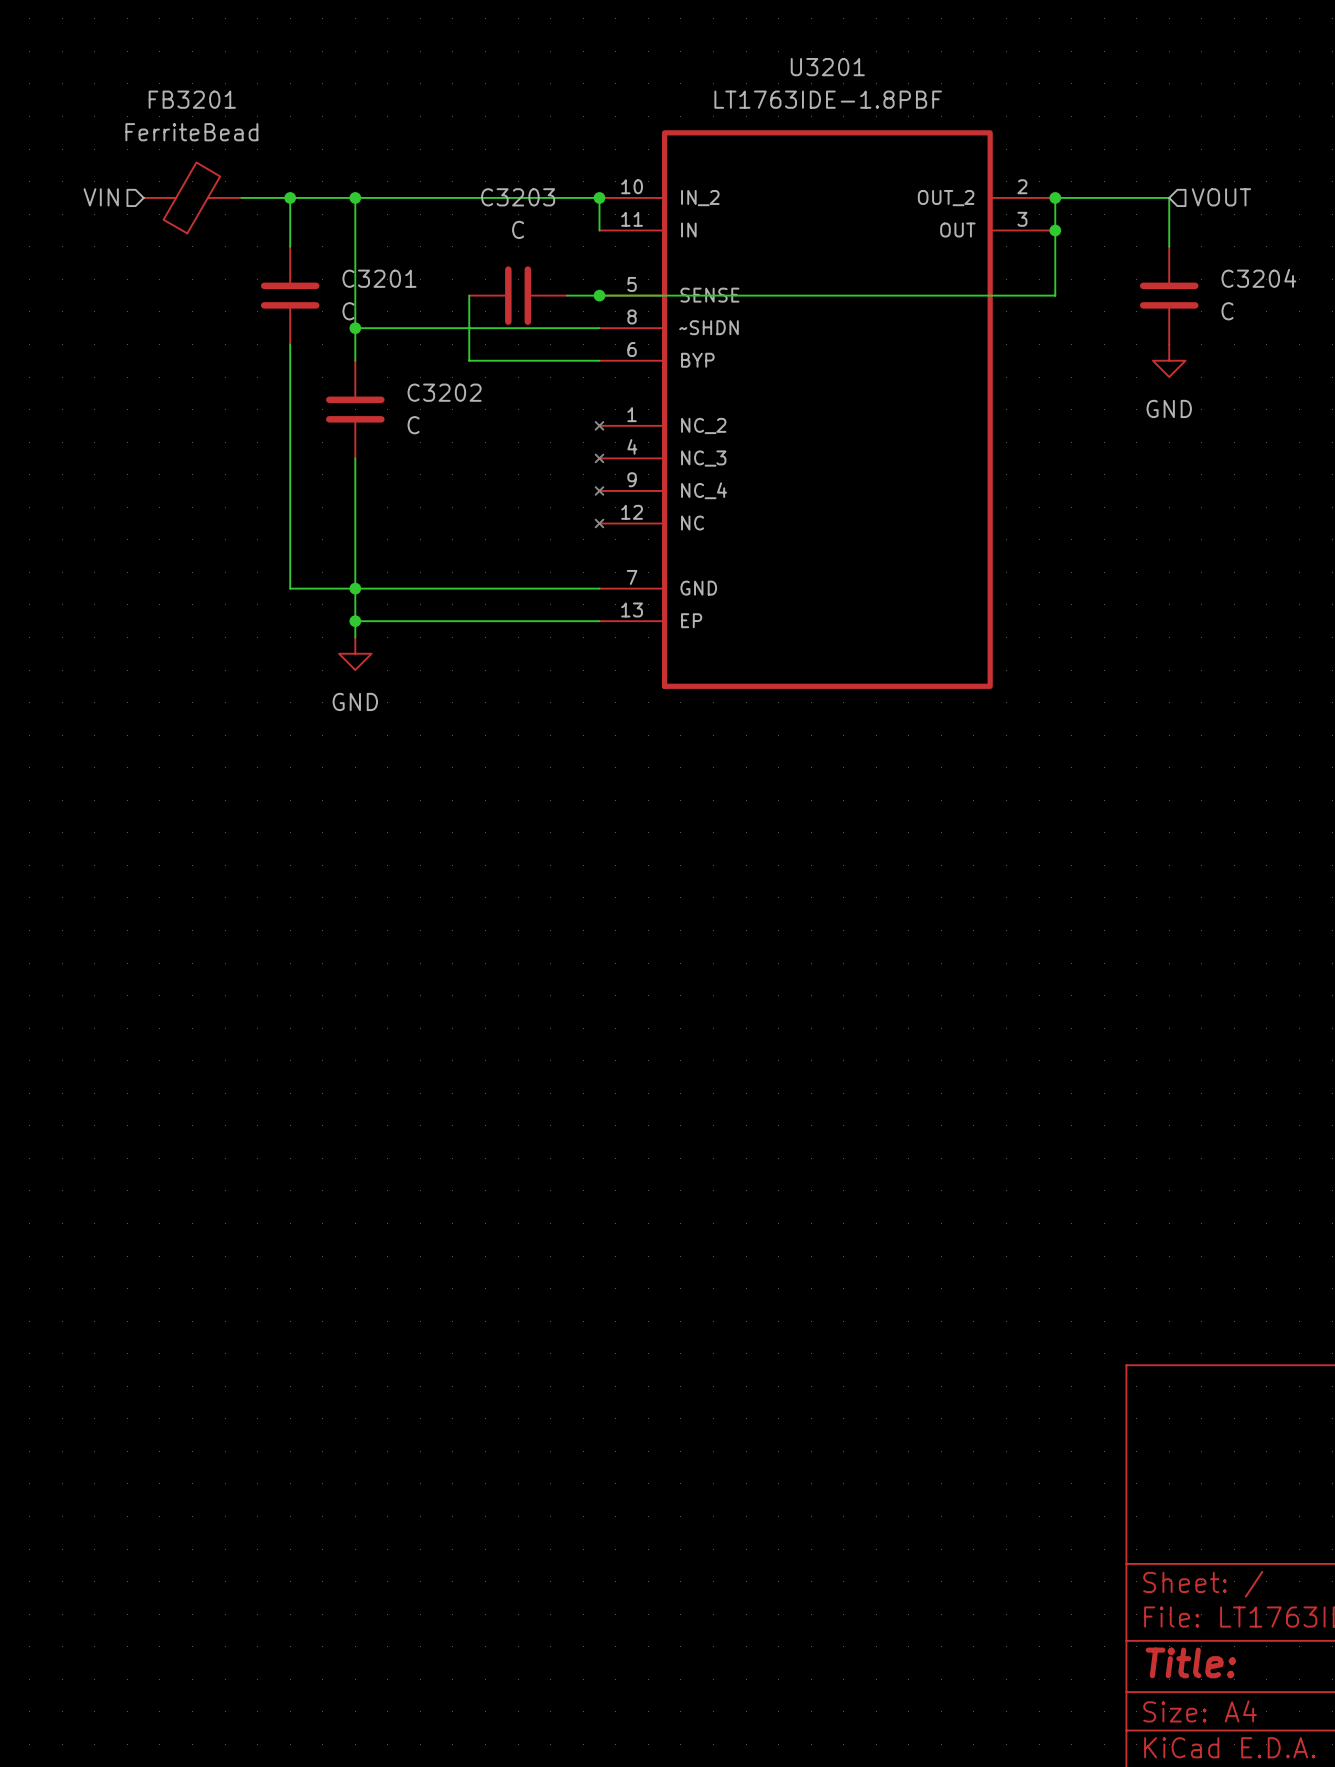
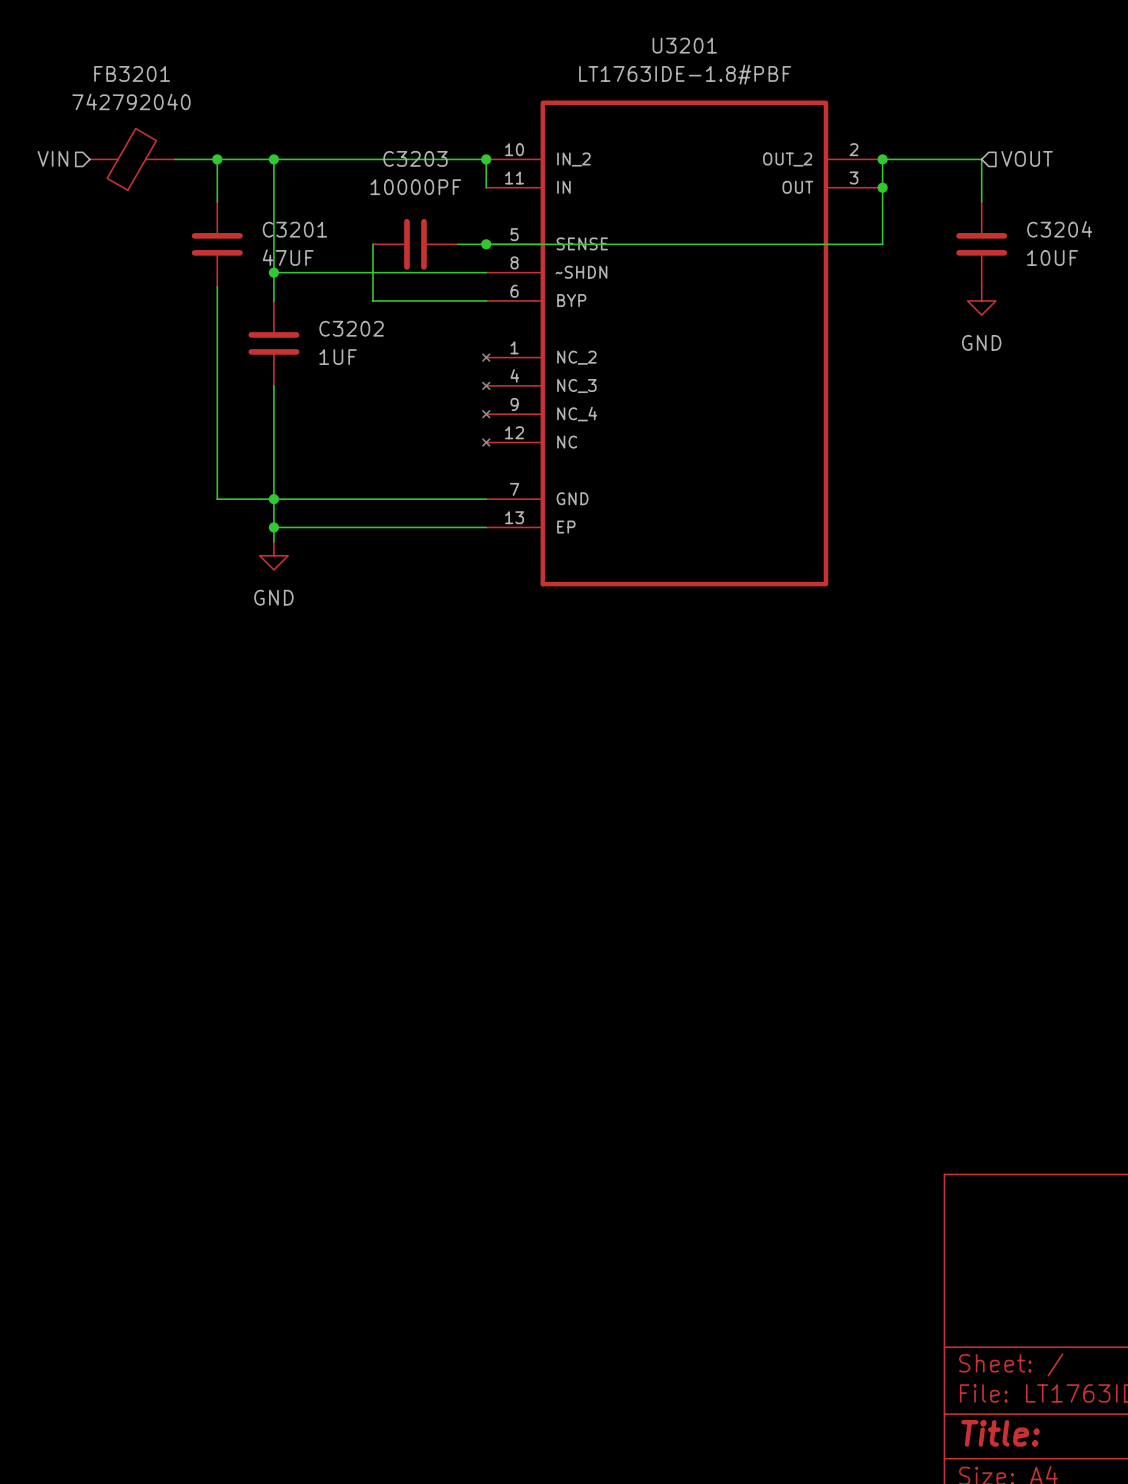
U3201 value: LT1763IDE-1.8PBF (828, 99) -> LT1763IDE-1.8#PBF (685, 74)
FB3201 value: FerriteBead (191, 132) -> 742792040 (131, 101)
C3203 value: C (518, 229) -> 10000PF (415, 187)
C3201 value: C (348, 311) -> 47UF (288, 257)
C3204 value: C (1227, 311) -> 10UF (1052, 257)
C3202 value: C (413, 425) -> 1UF (338, 357)

